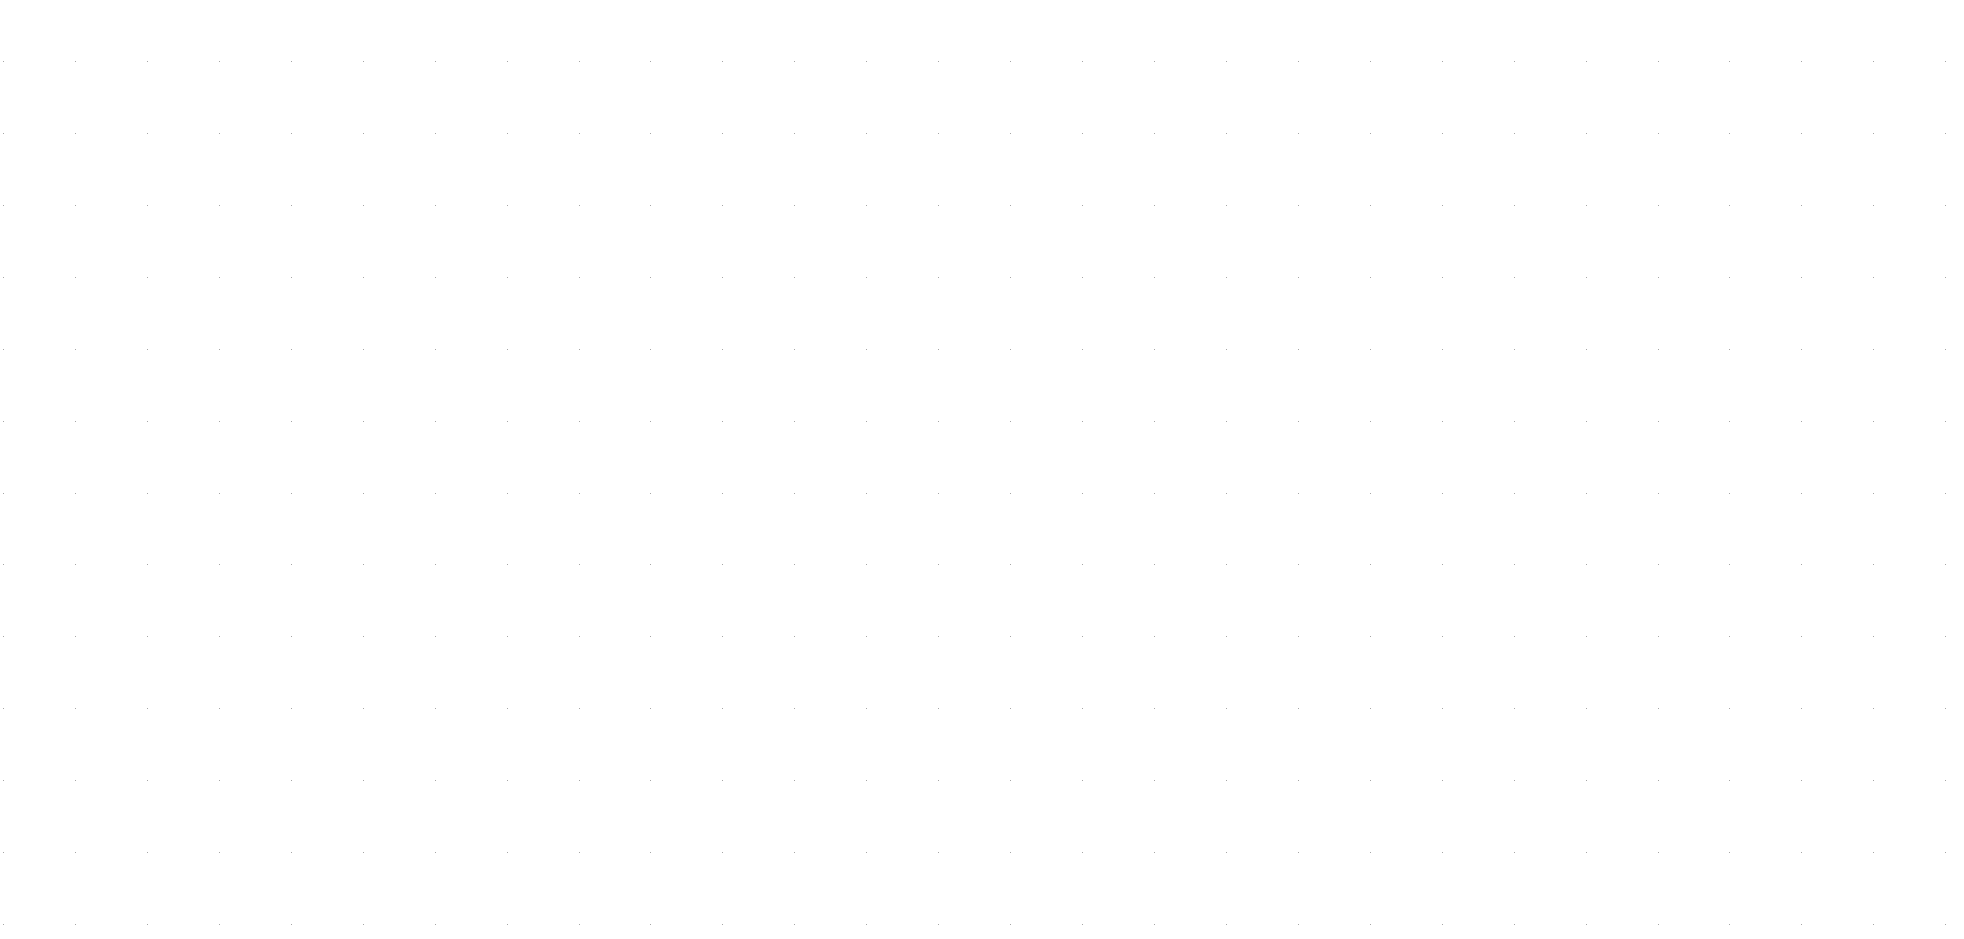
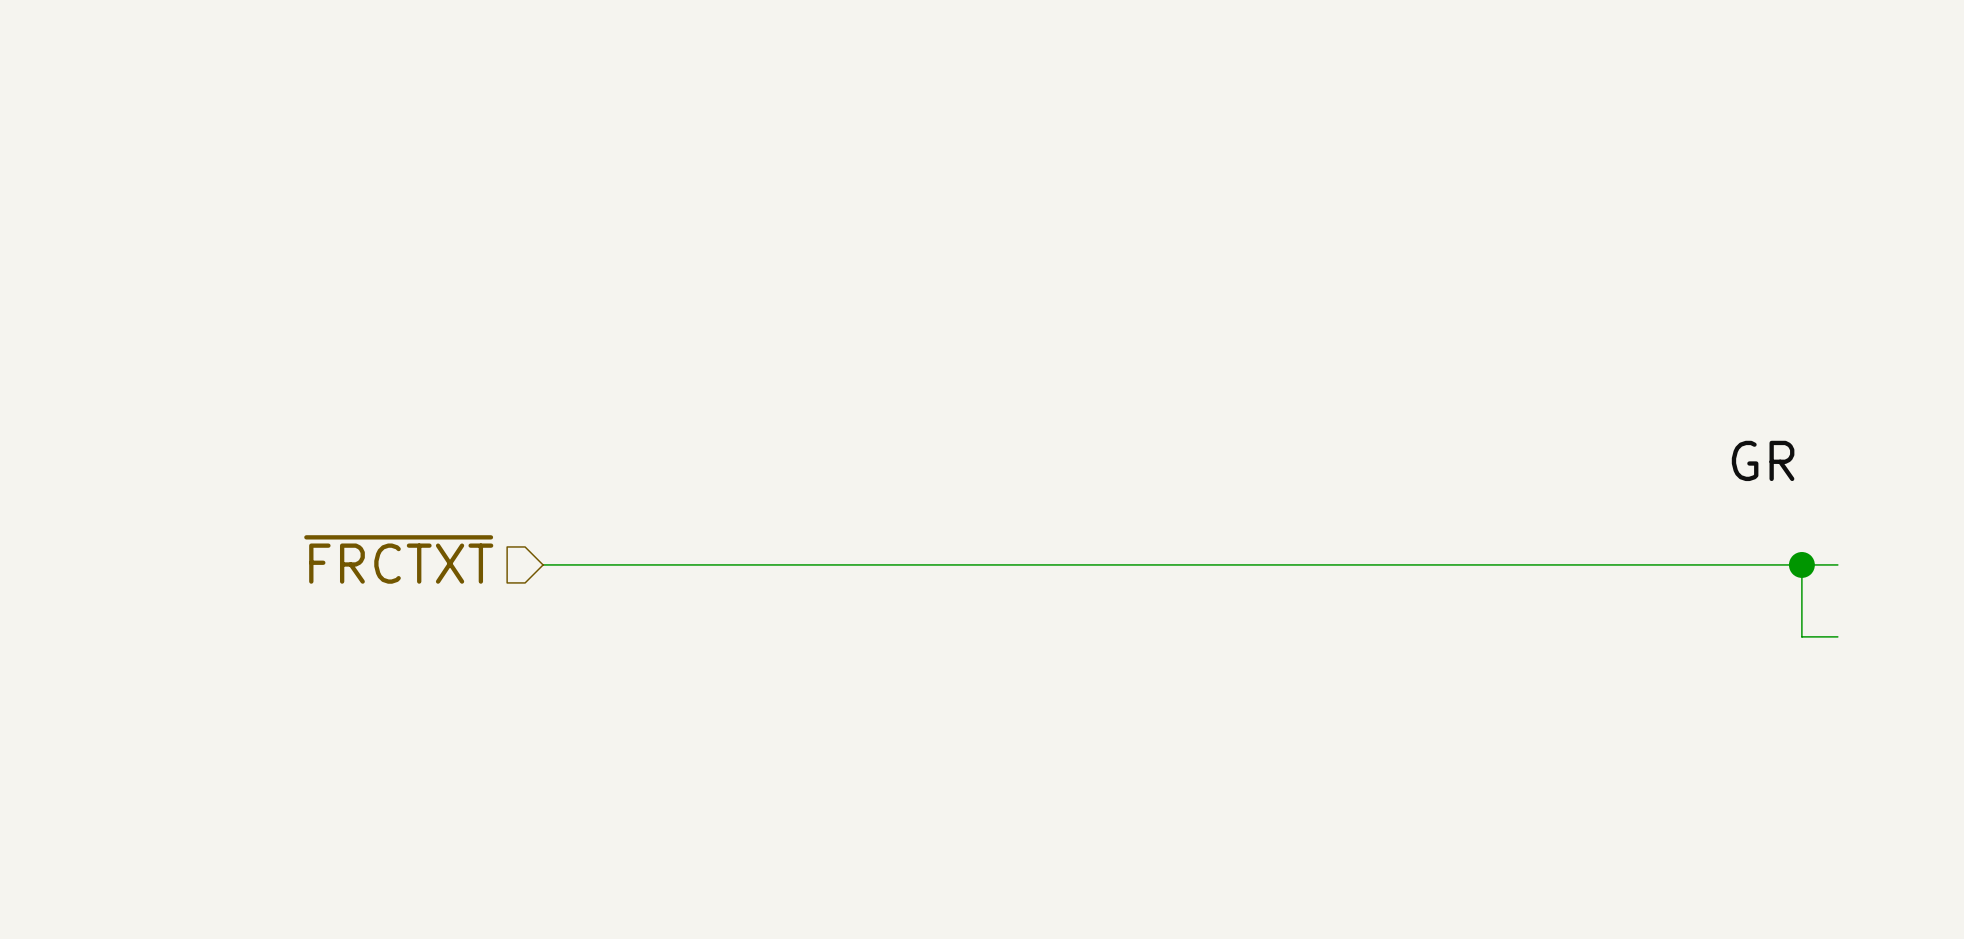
label: none -> GR (1763, 460)
hierarchical label: none -> ~{FRCTXT} (398, 559)
wire: none -> (543, 564) (1837, 564)
wire: none -> (1801, 564) (1801, 636) (1837, 636)
junction: none -> (1801, 564)

